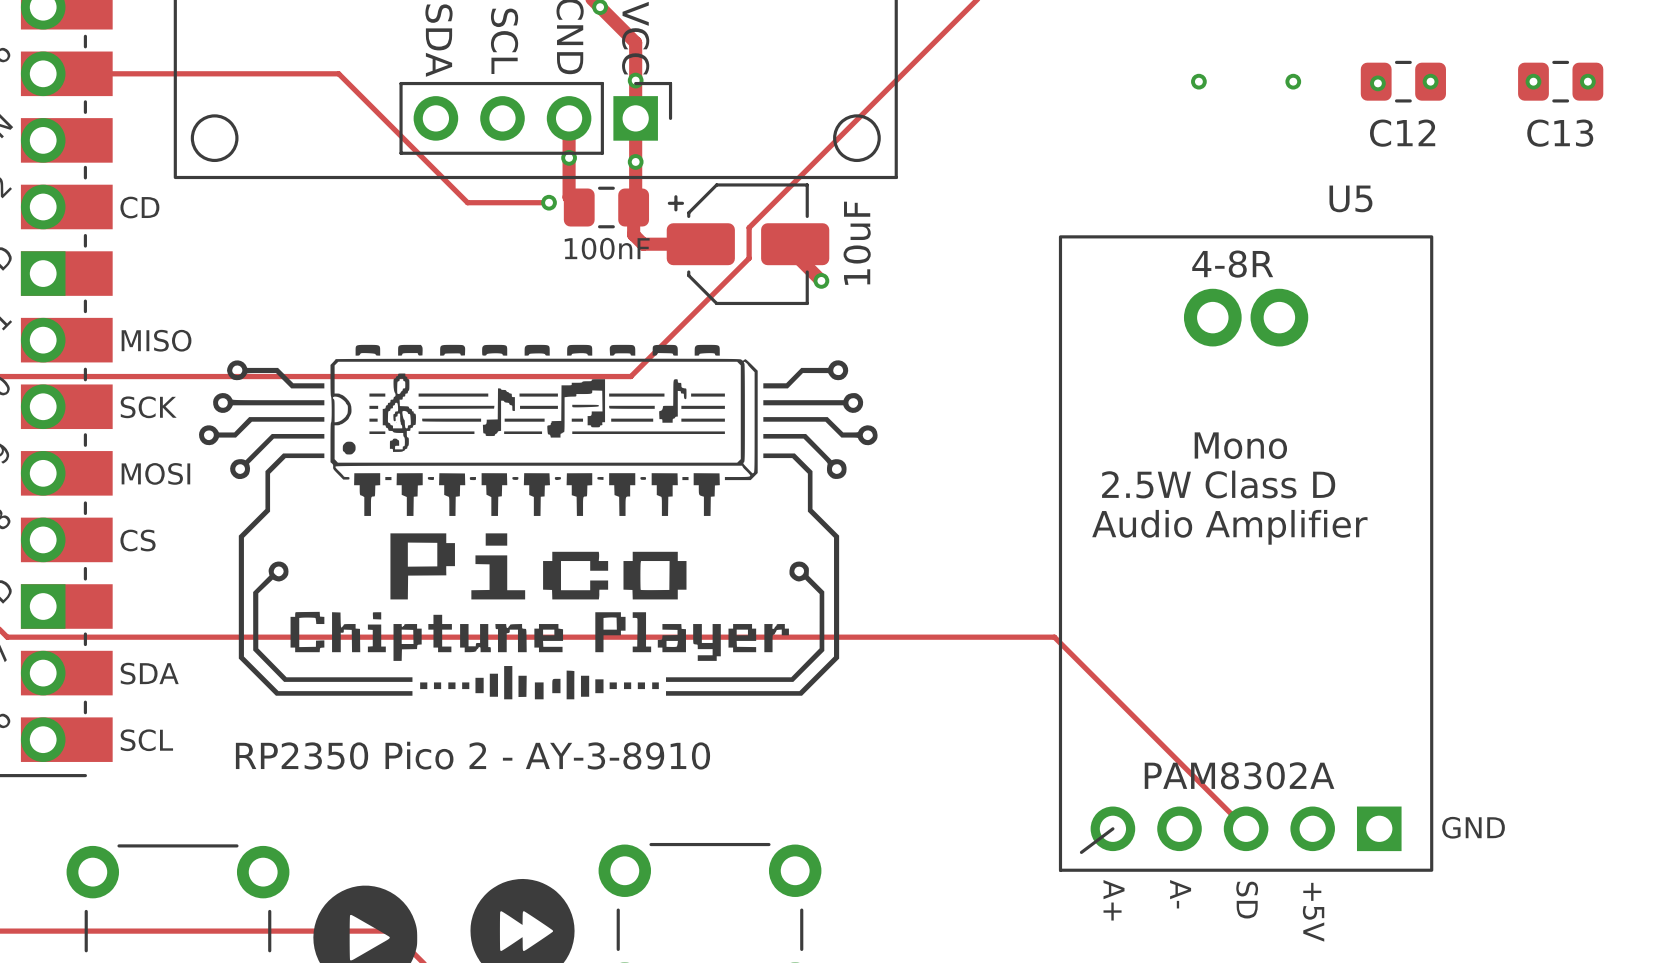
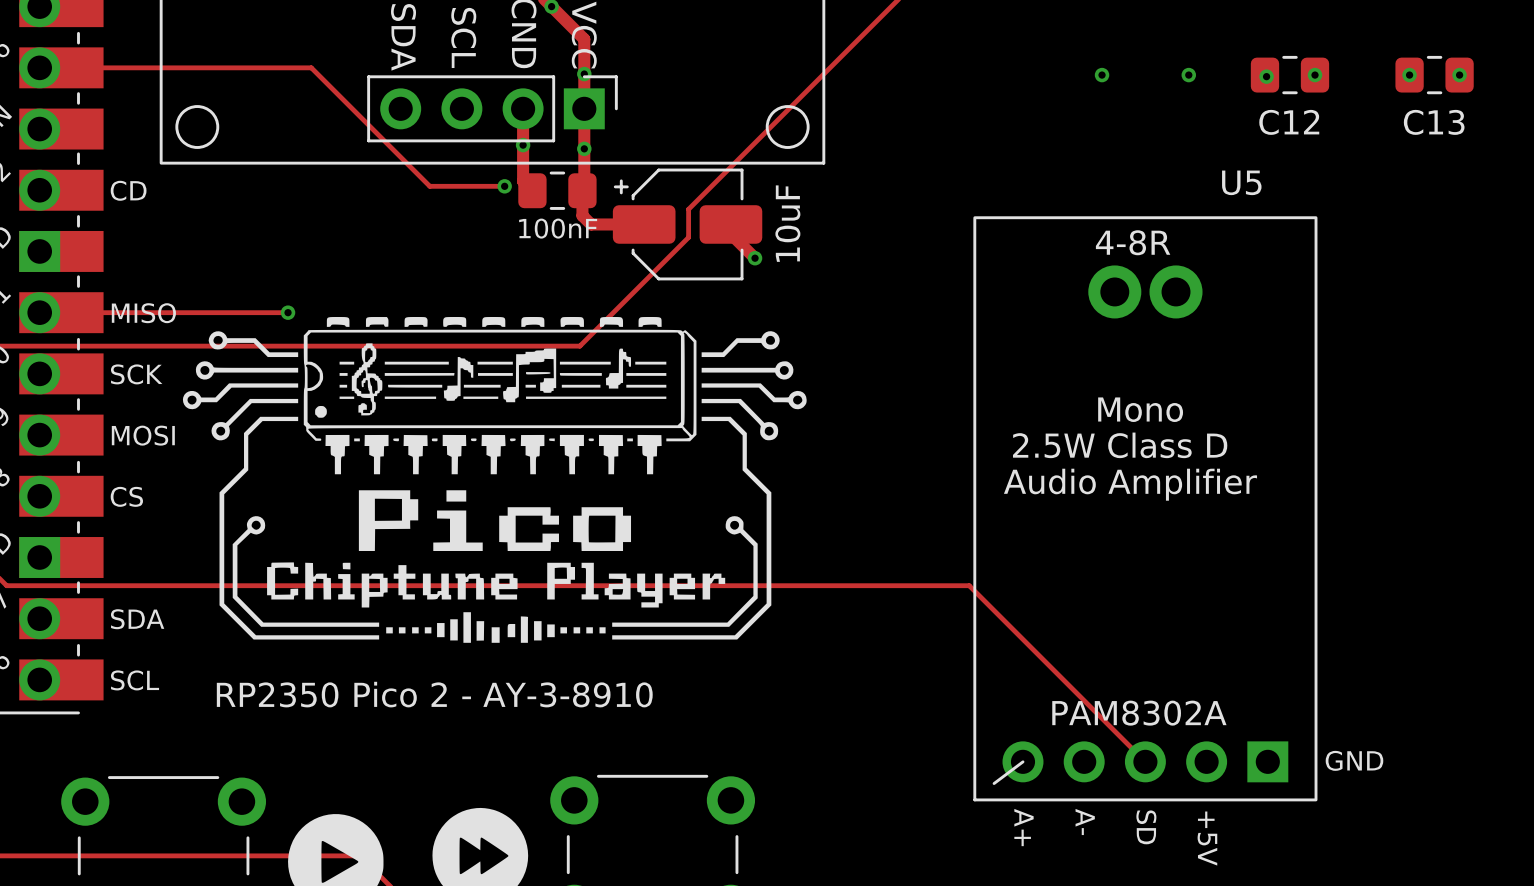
track: none -> (39, 312) (288, 312)
via: none -> (288, 312)

